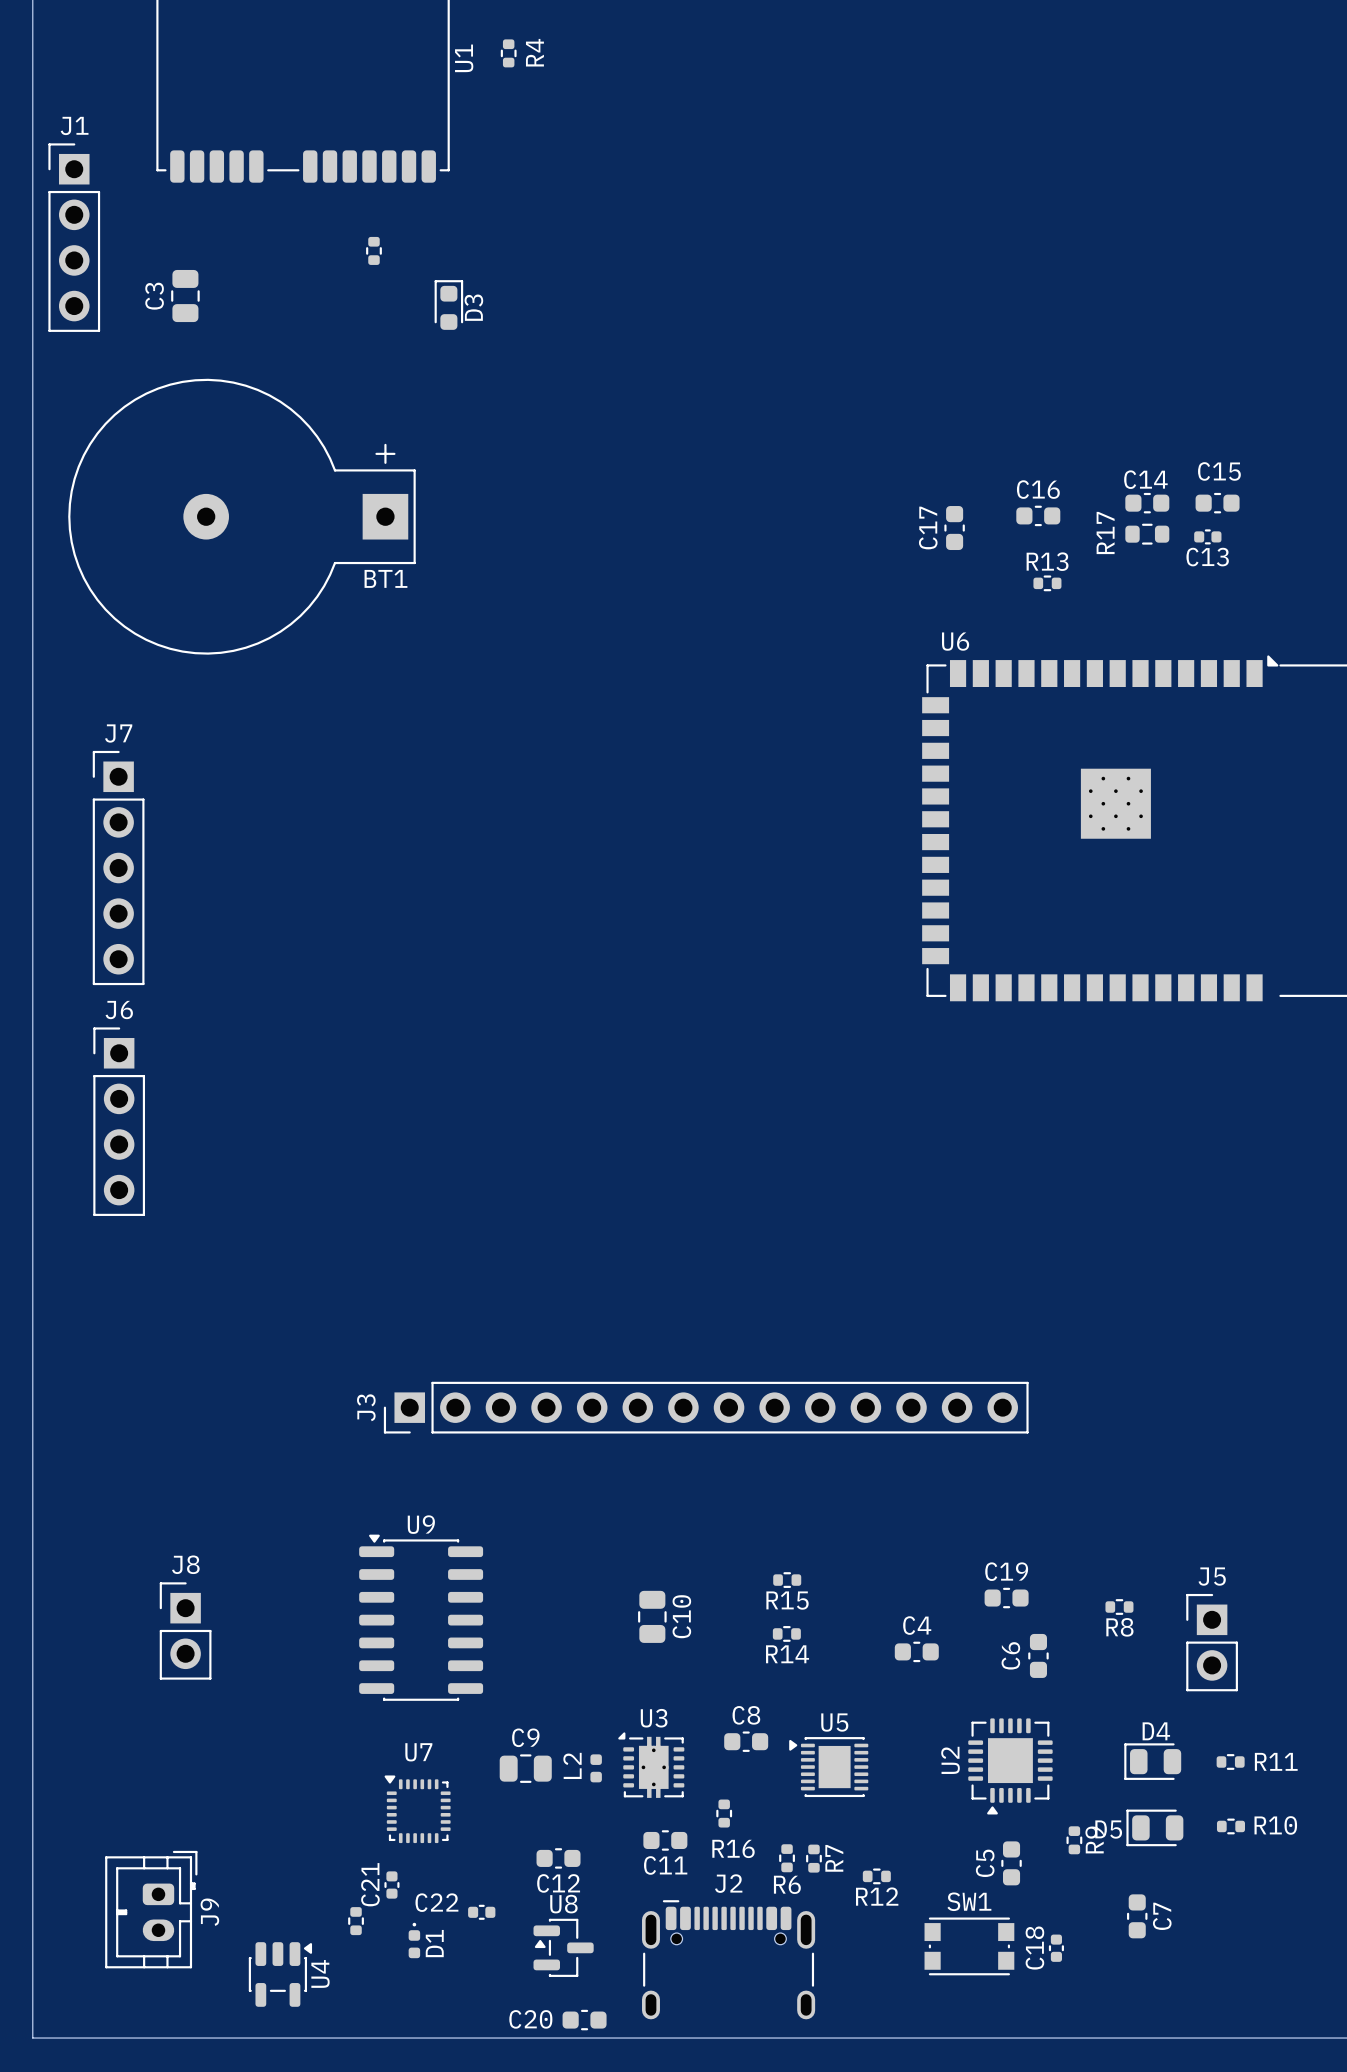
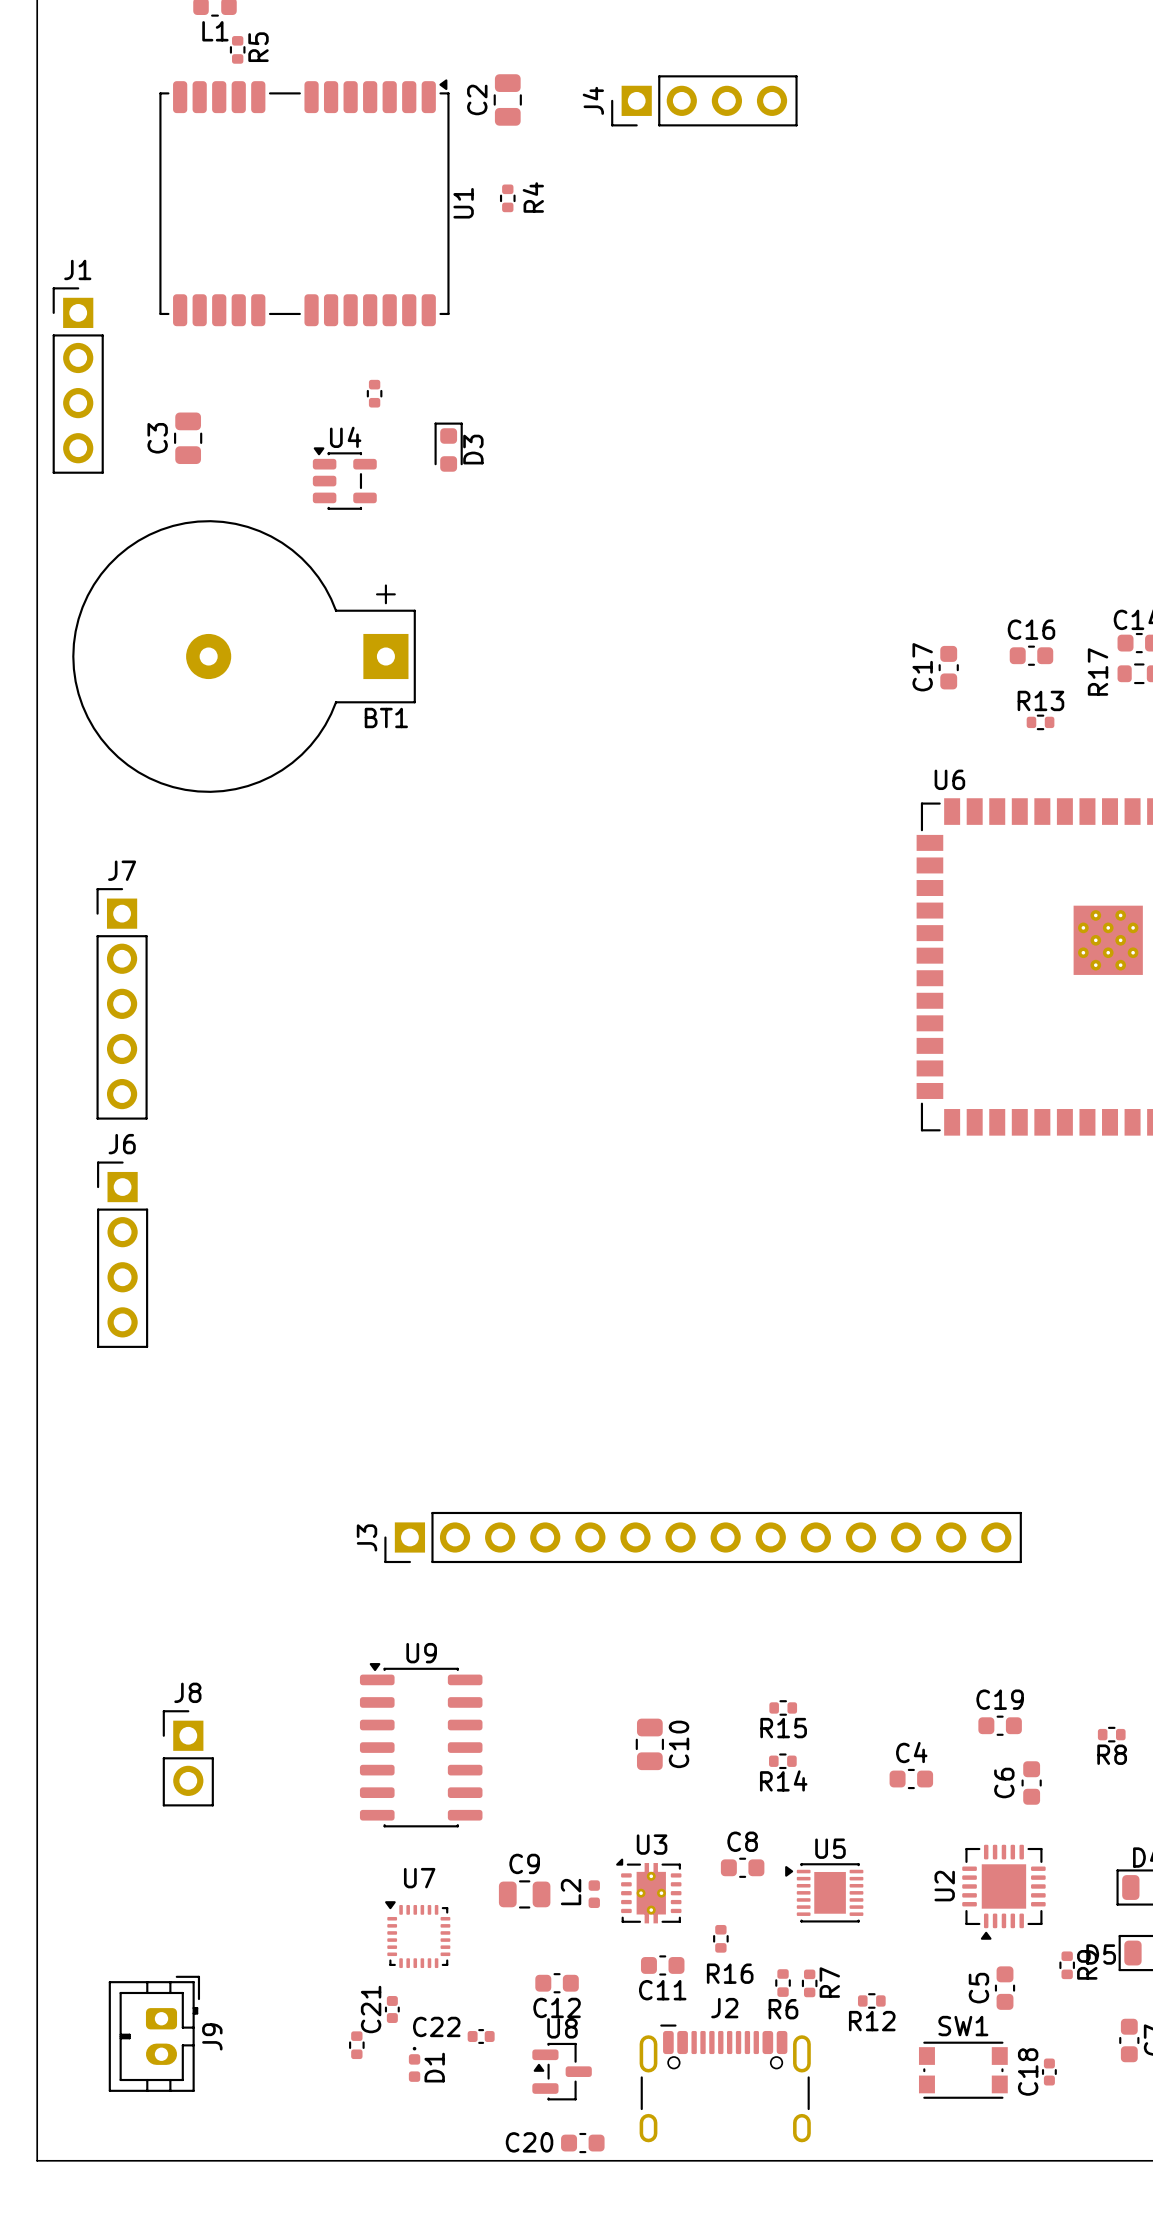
U4 rotation: 0° (280, 1974) -> 90° counterclockwise (344, 478)
U4 position: (280, 1974) -> (344, 478)

